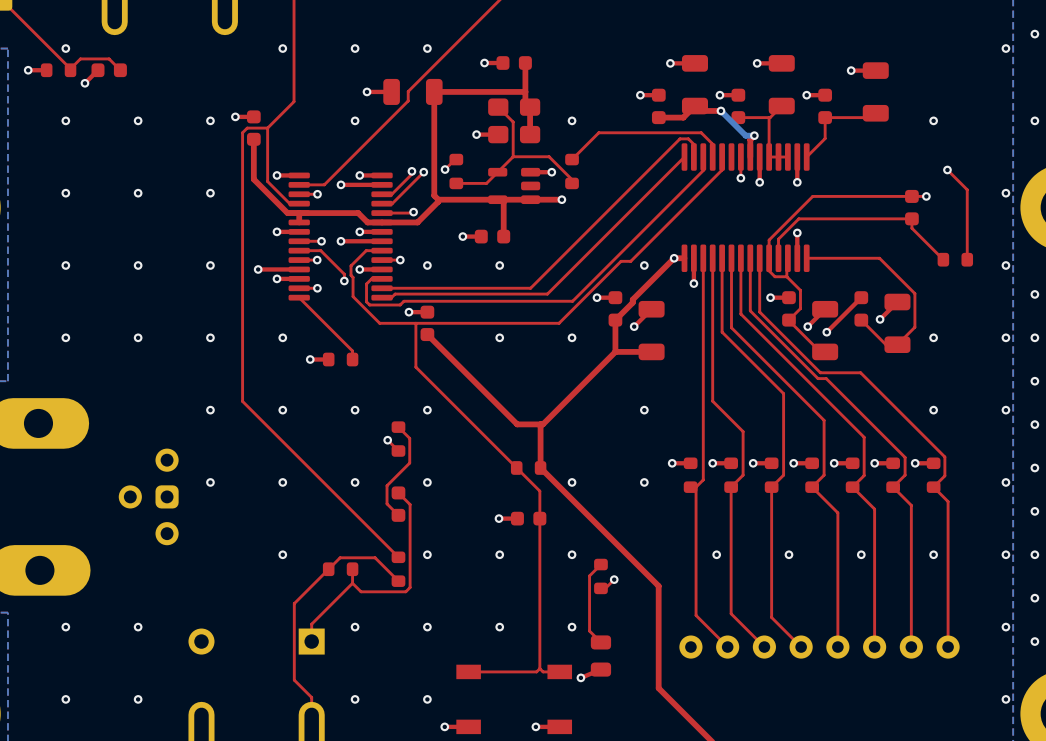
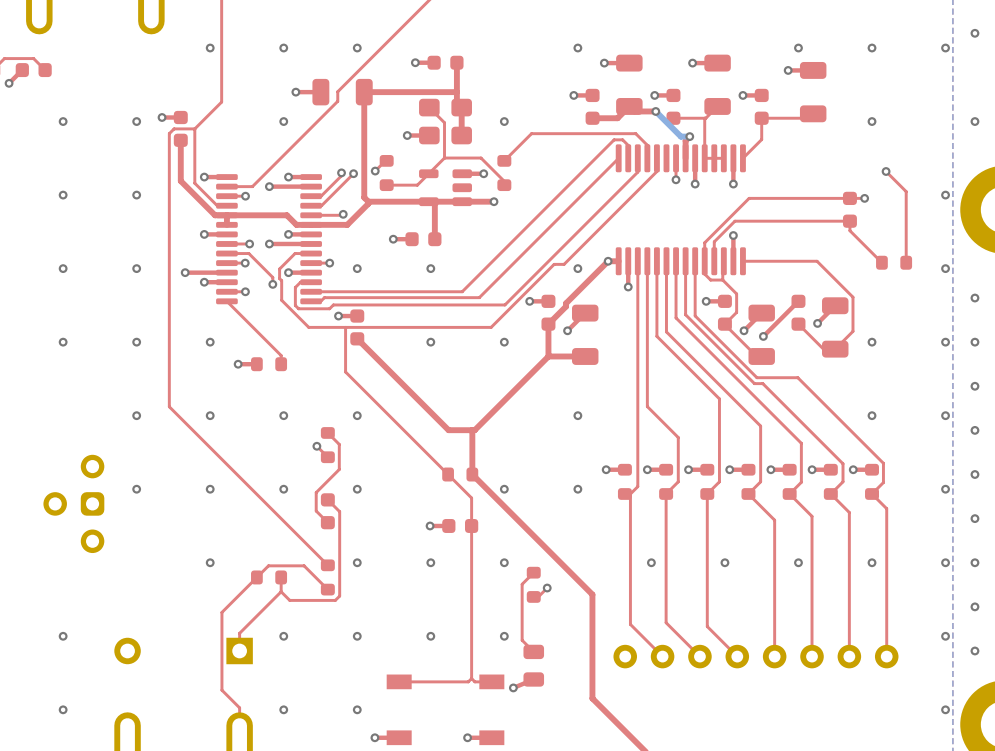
via: none -> (577, 48)
via: none -> (798, 48)
via: none -> (872, 48)

